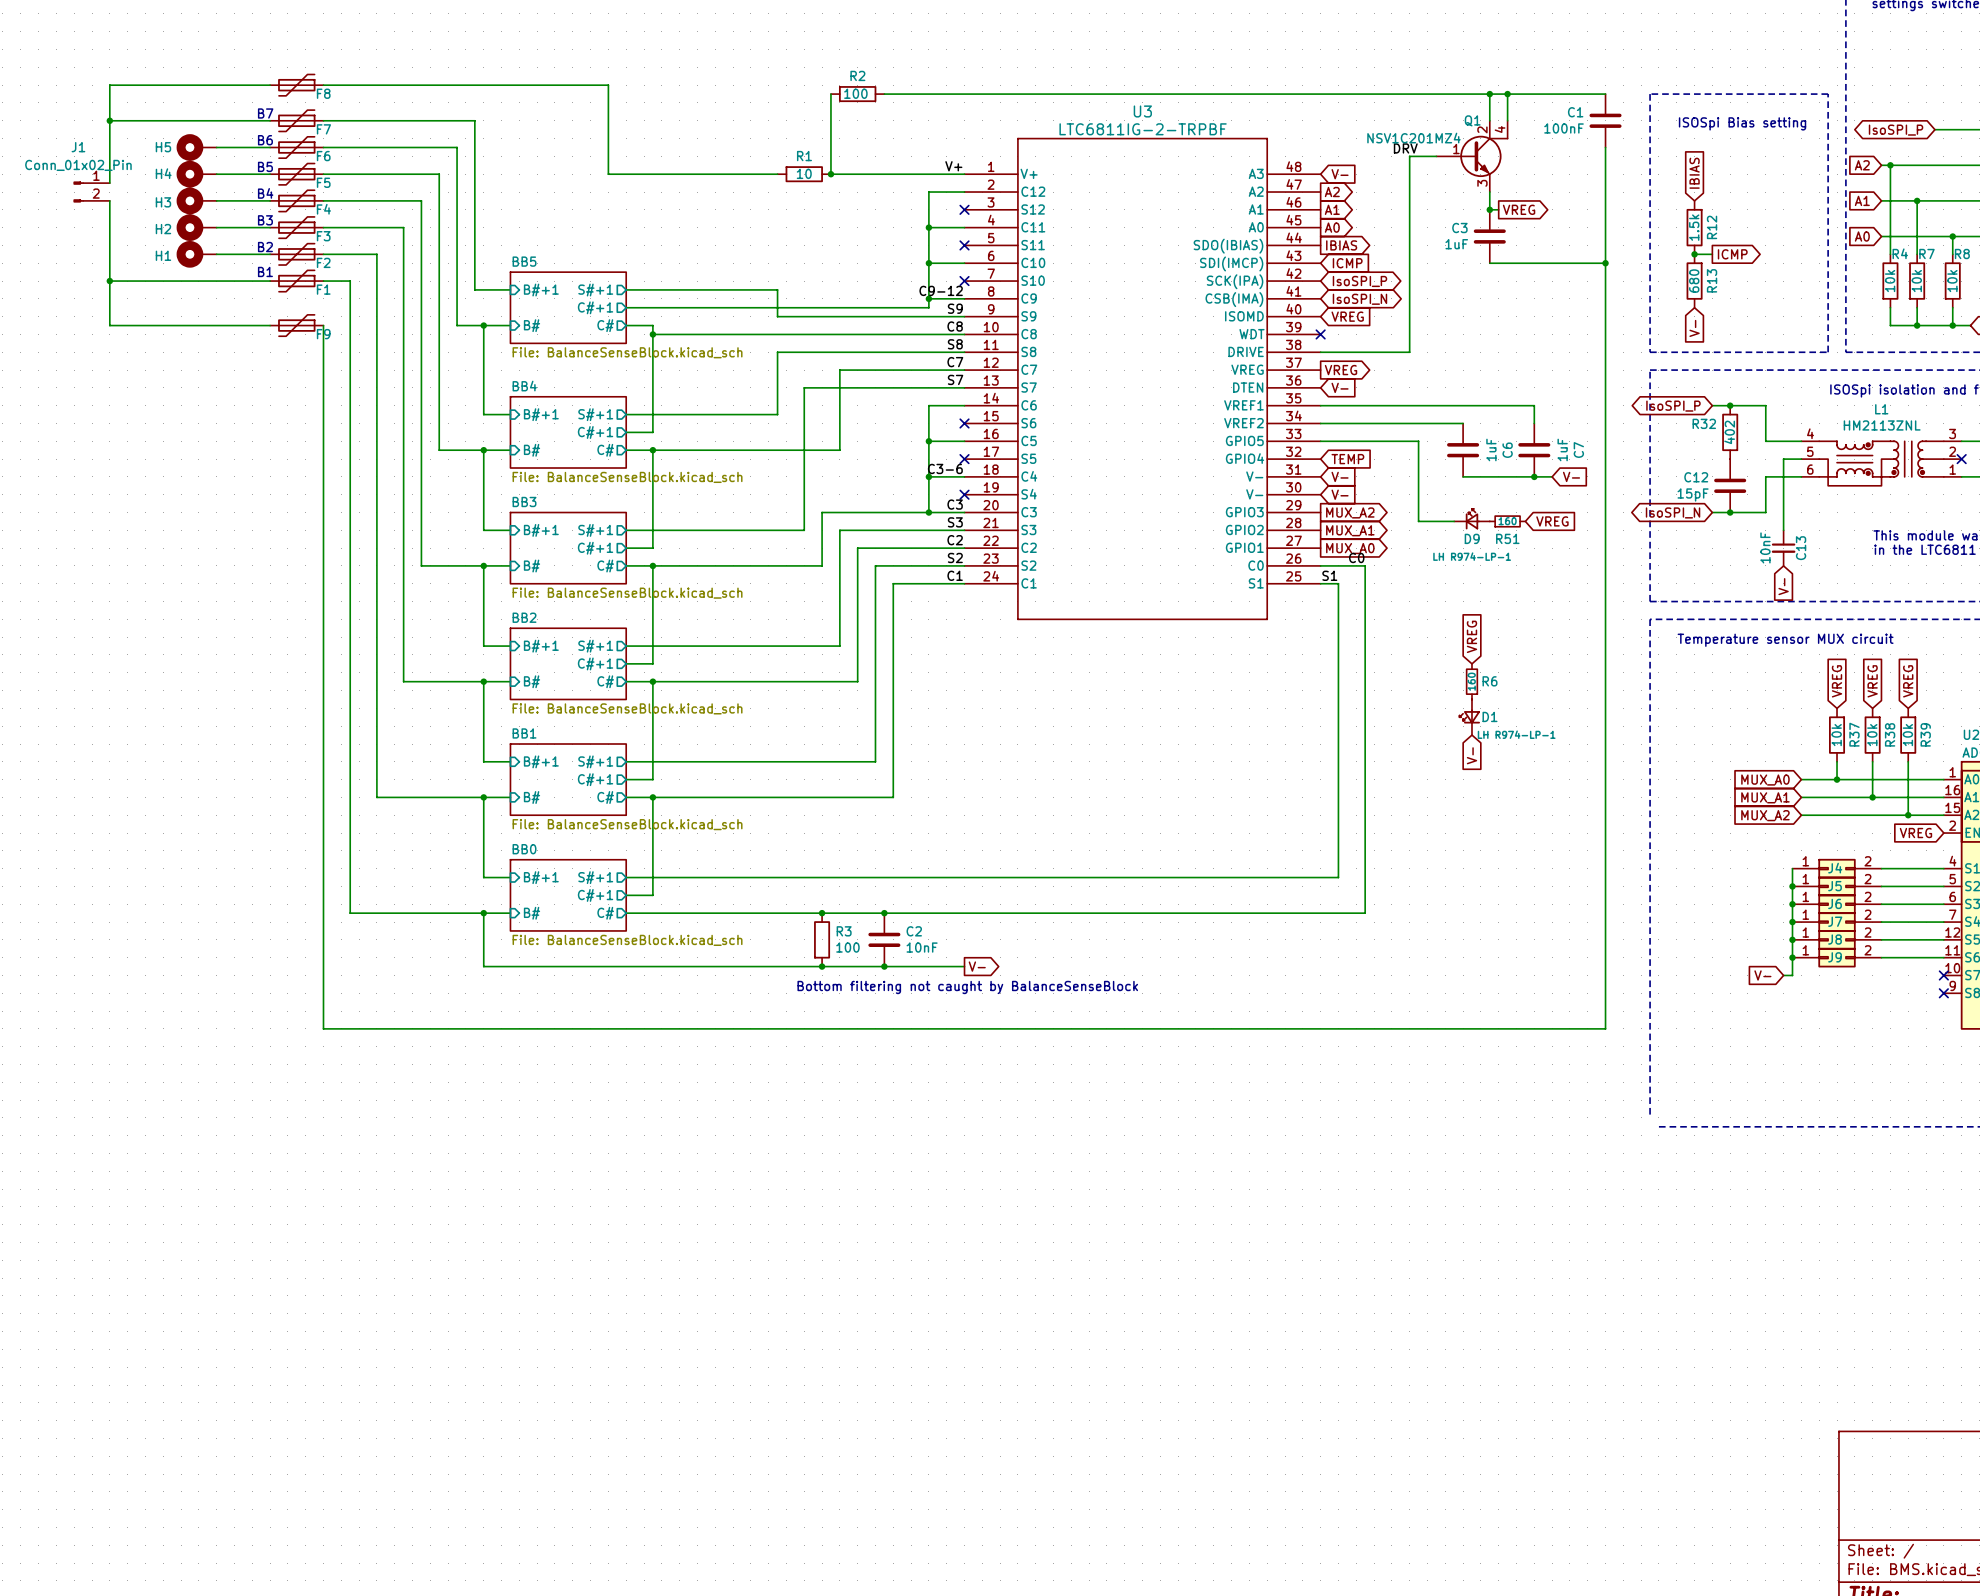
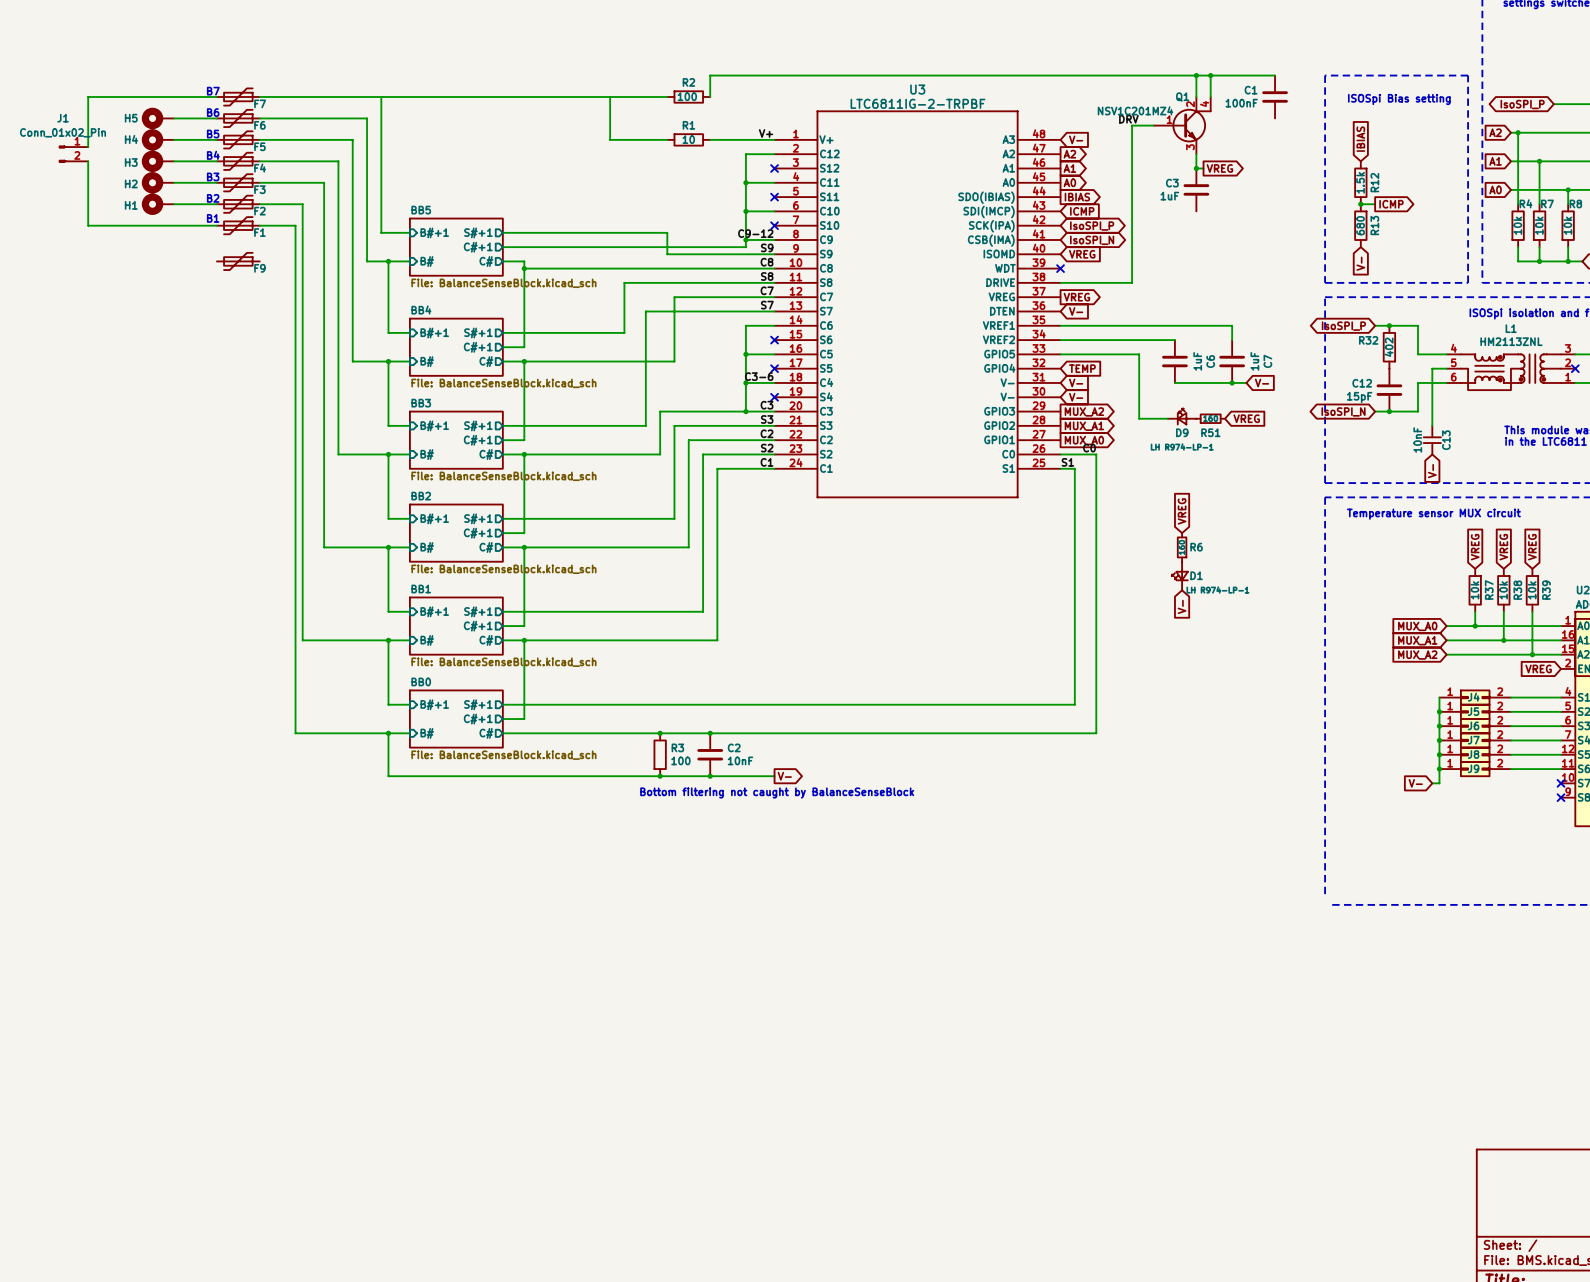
wire: (270, 85) (109, 85) (109, 120) -> none
F8: (296, 85) -> none
wire: (323, 85) (608, 85) (608, 174) (759, 174) -> (610, 97) (610, 139)
wire: (830, 94) (830, 174) (884, 174) -> none
R2 position: (857, 94) -> (688, 97)
wire: none -> (710, 75) (710, 97)
wire: (1587, 94) (1605, 94) -> none
junction: (109, 120) -> none
wire: none -> (381, 97) (667, 97)
C1 position: (1605, 120) -> (1275, 97)
wire: (1605, 147) (1605, 1028) (323, 1028) (323, 325) -> none
wire: none -> (624, 139) (667, 139)
R1 position: (804, 174) -> (688, 139)
junction: (830, 174) -> none
wire: (1489, 263) (1605, 263) -> none
junction: (1605, 263) -> none
wire: (109, 281) (109, 325) (270, 325) -> none
junction: (109, 281) -> none
wire: (350, 281) (350, 913) (368, 913) -> (281, 225) (295, 225) (295, 733)
wire: (777, 289) (777, 316) (830, 316) -> (624, 232) (667, 232) (667, 254)

